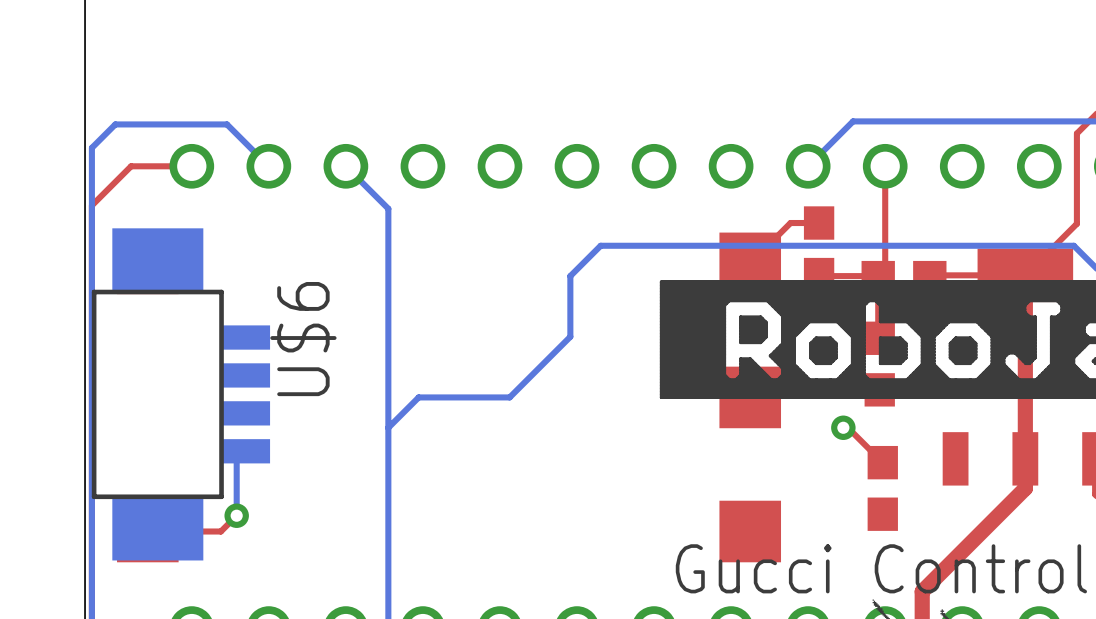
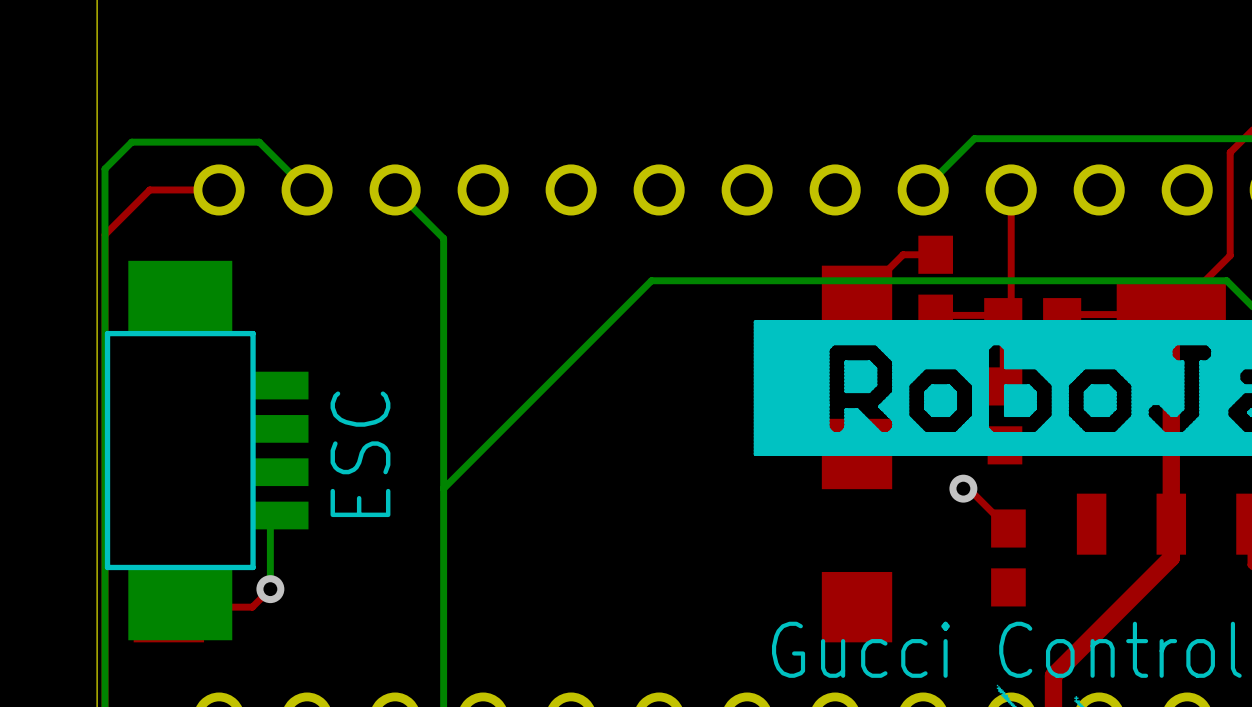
bottom track: (600, 245) (570, 276) (570, 336) (509, 397) (418, 397) -> (686, 280) (651, 280) (478, 454)
U$6 name: U$6 (303, 339) -> ESC (360, 454)

